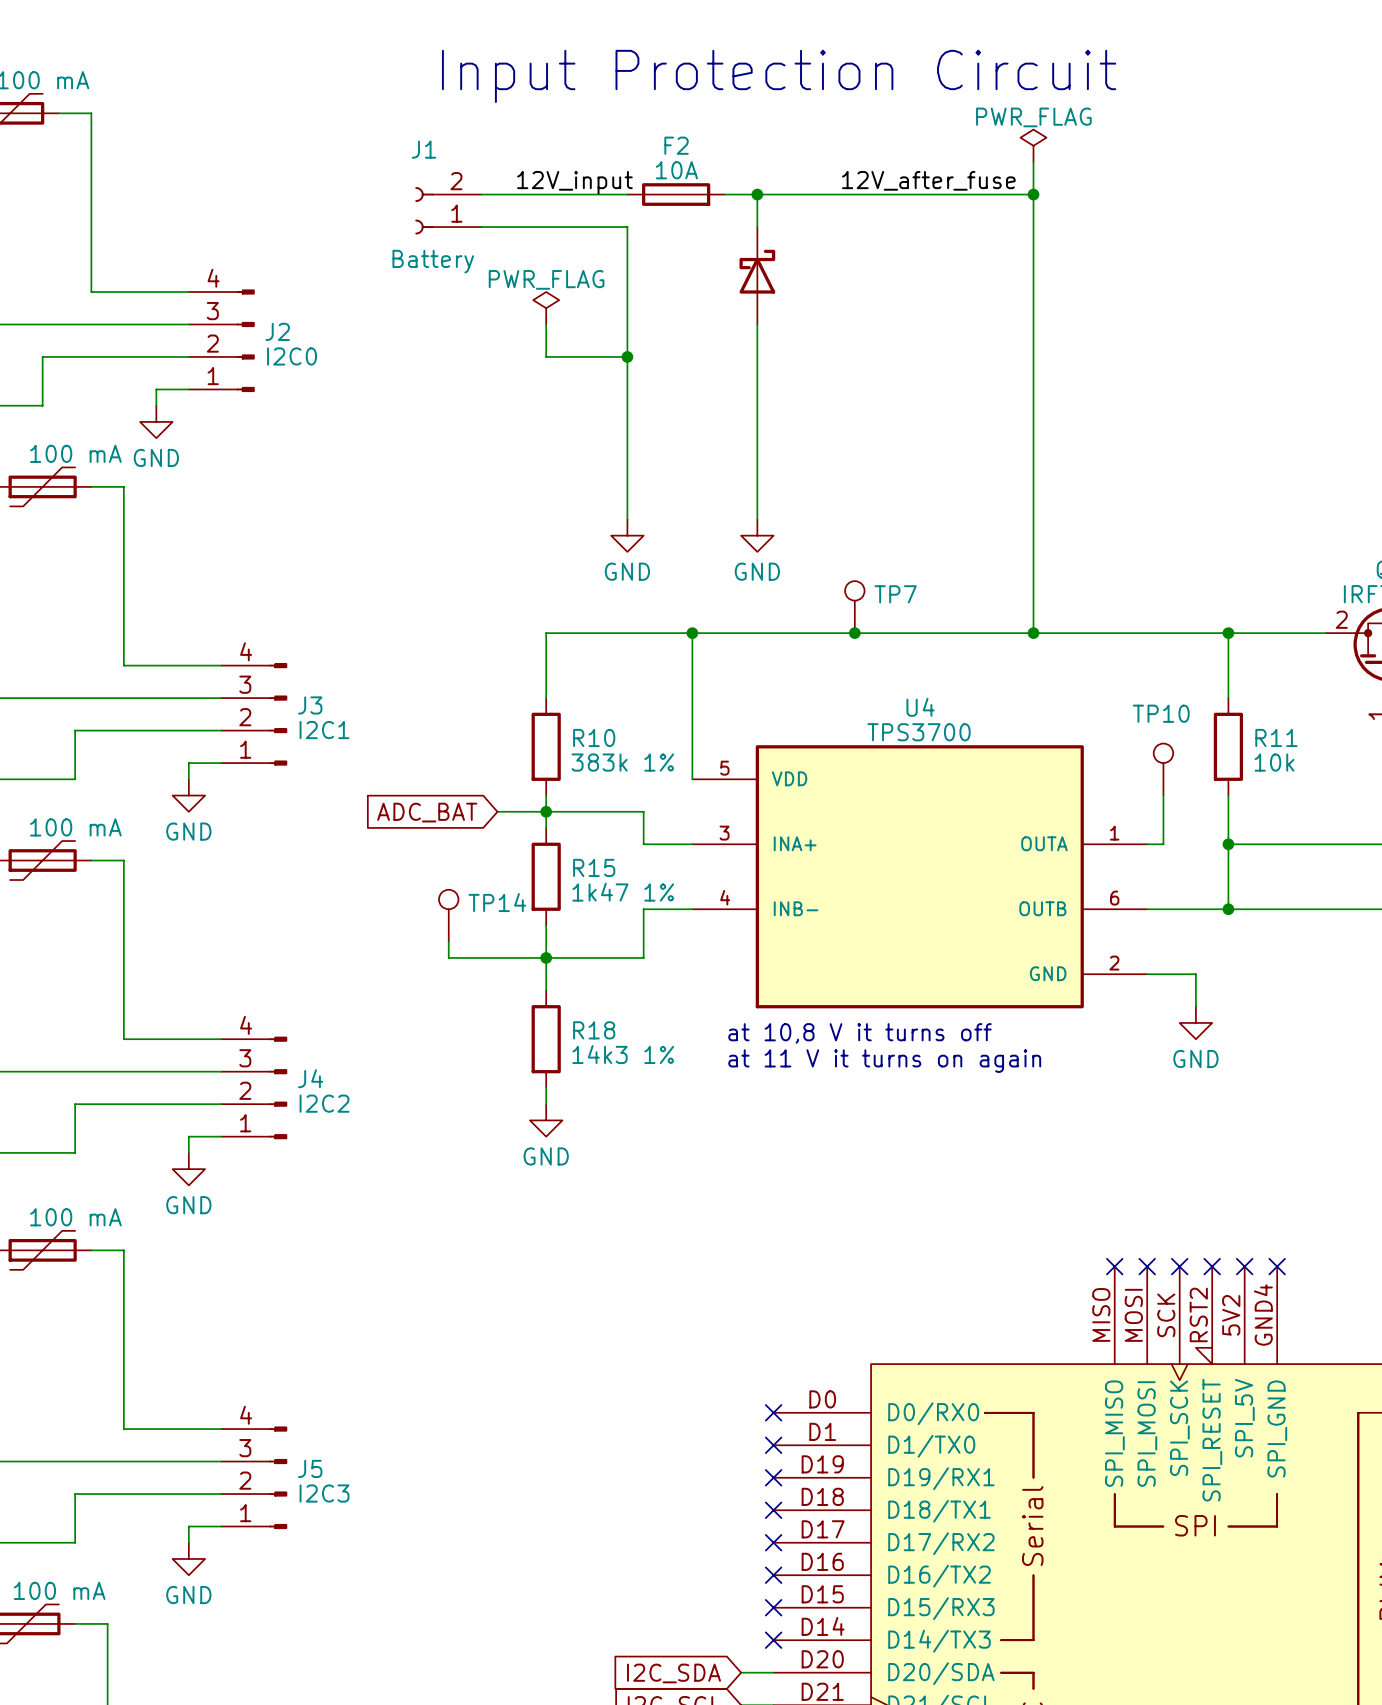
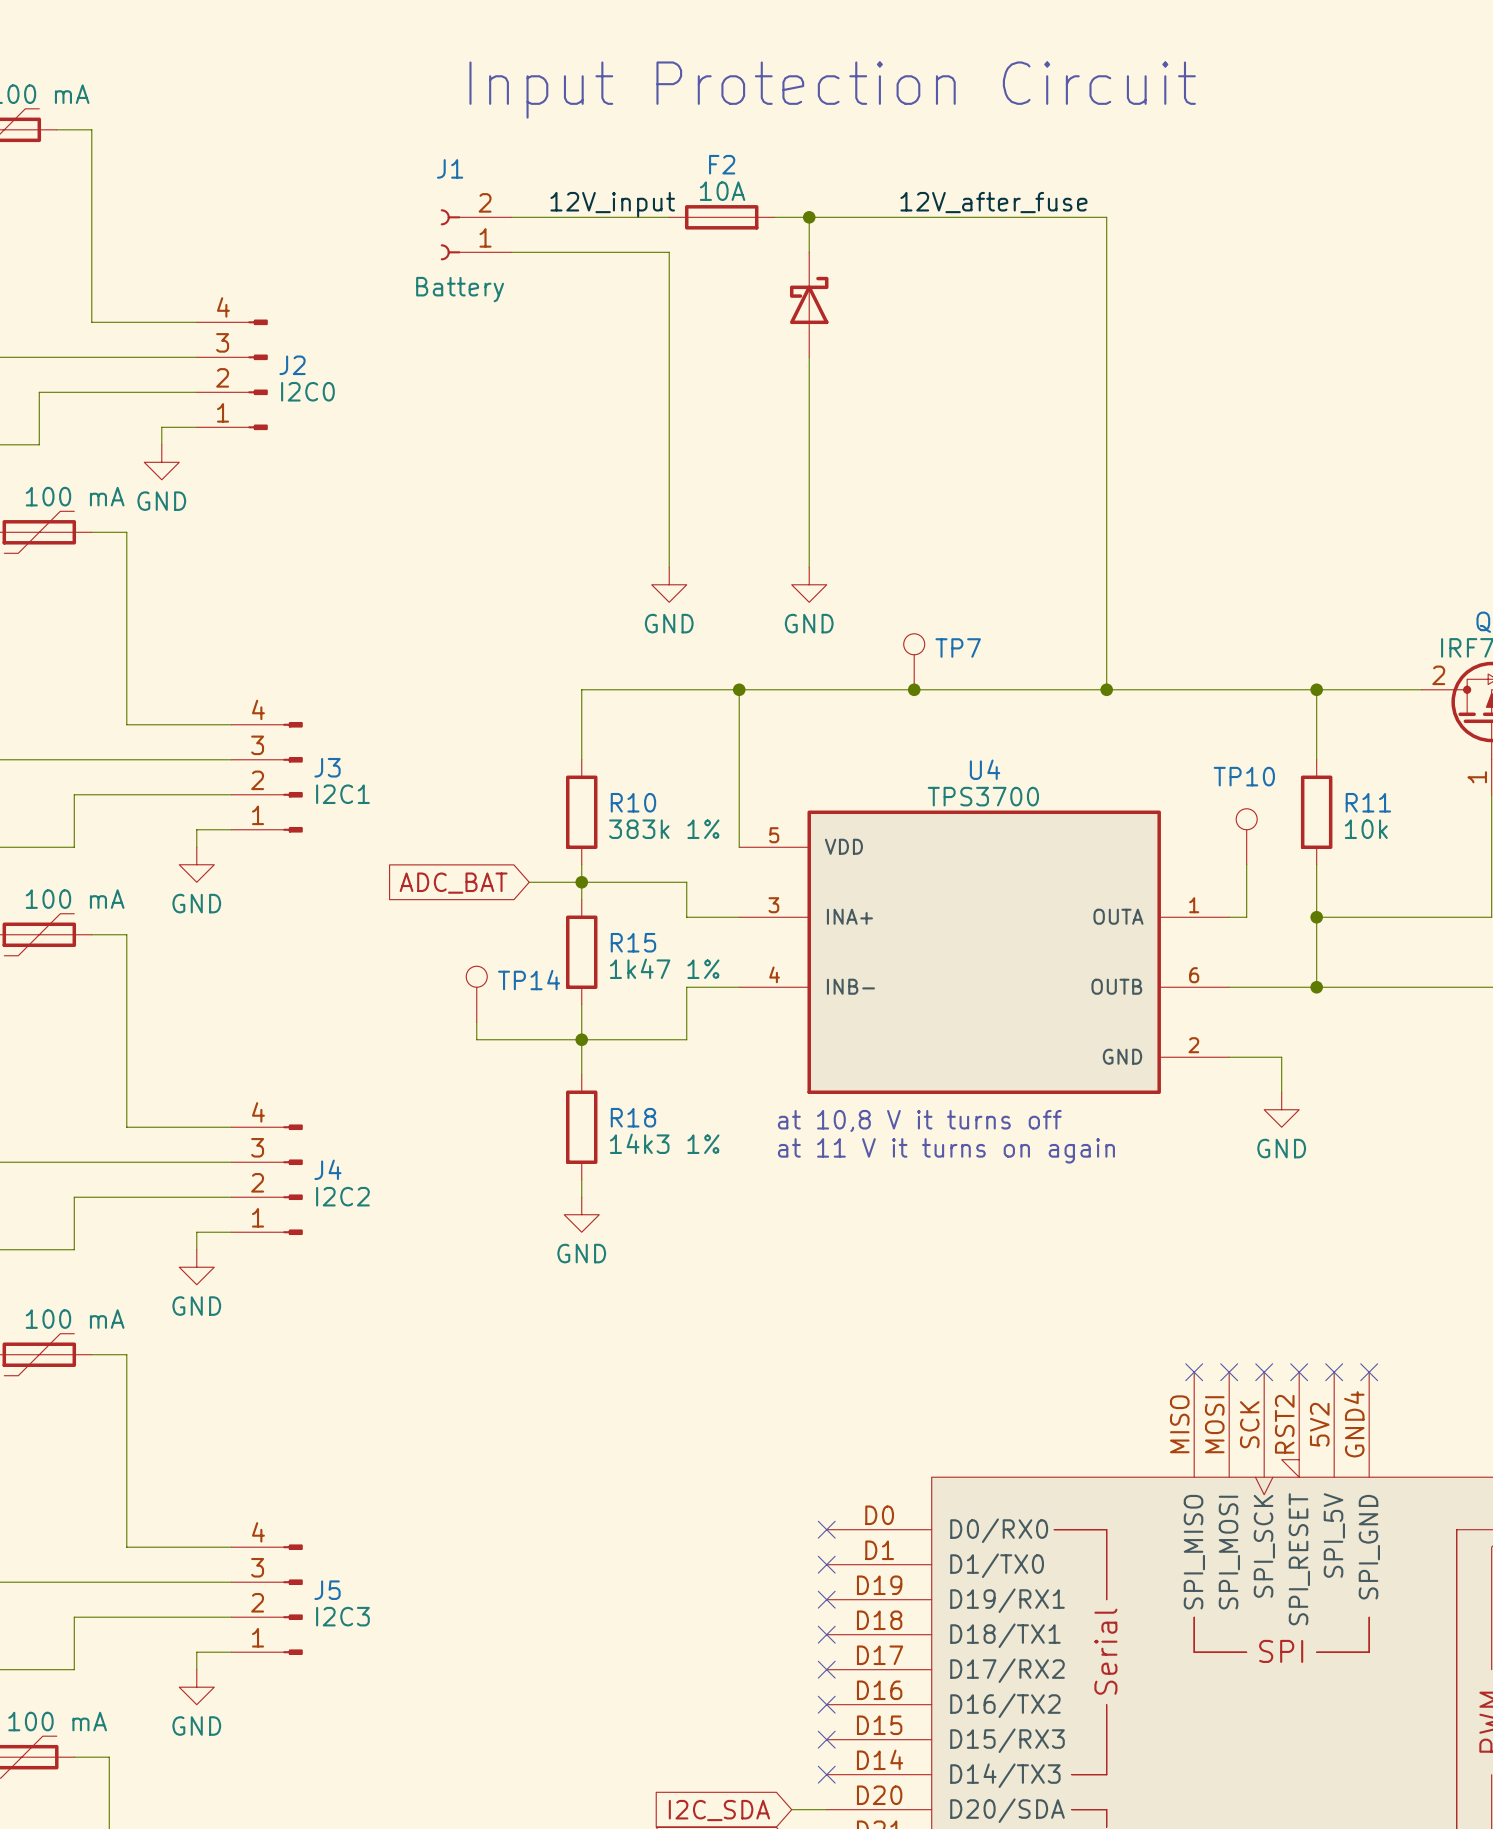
power symbol: PWR_FLAG (1033, 145) -> none
wire: (1033, 162) (1033, 194) -> none
junction: (1033, 194) -> none
power symbol: PWR_FLAG (546, 308) -> none
wire: (546, 324) (546, 356) (627, 356) -> none
junction: (627, 356) -> none

